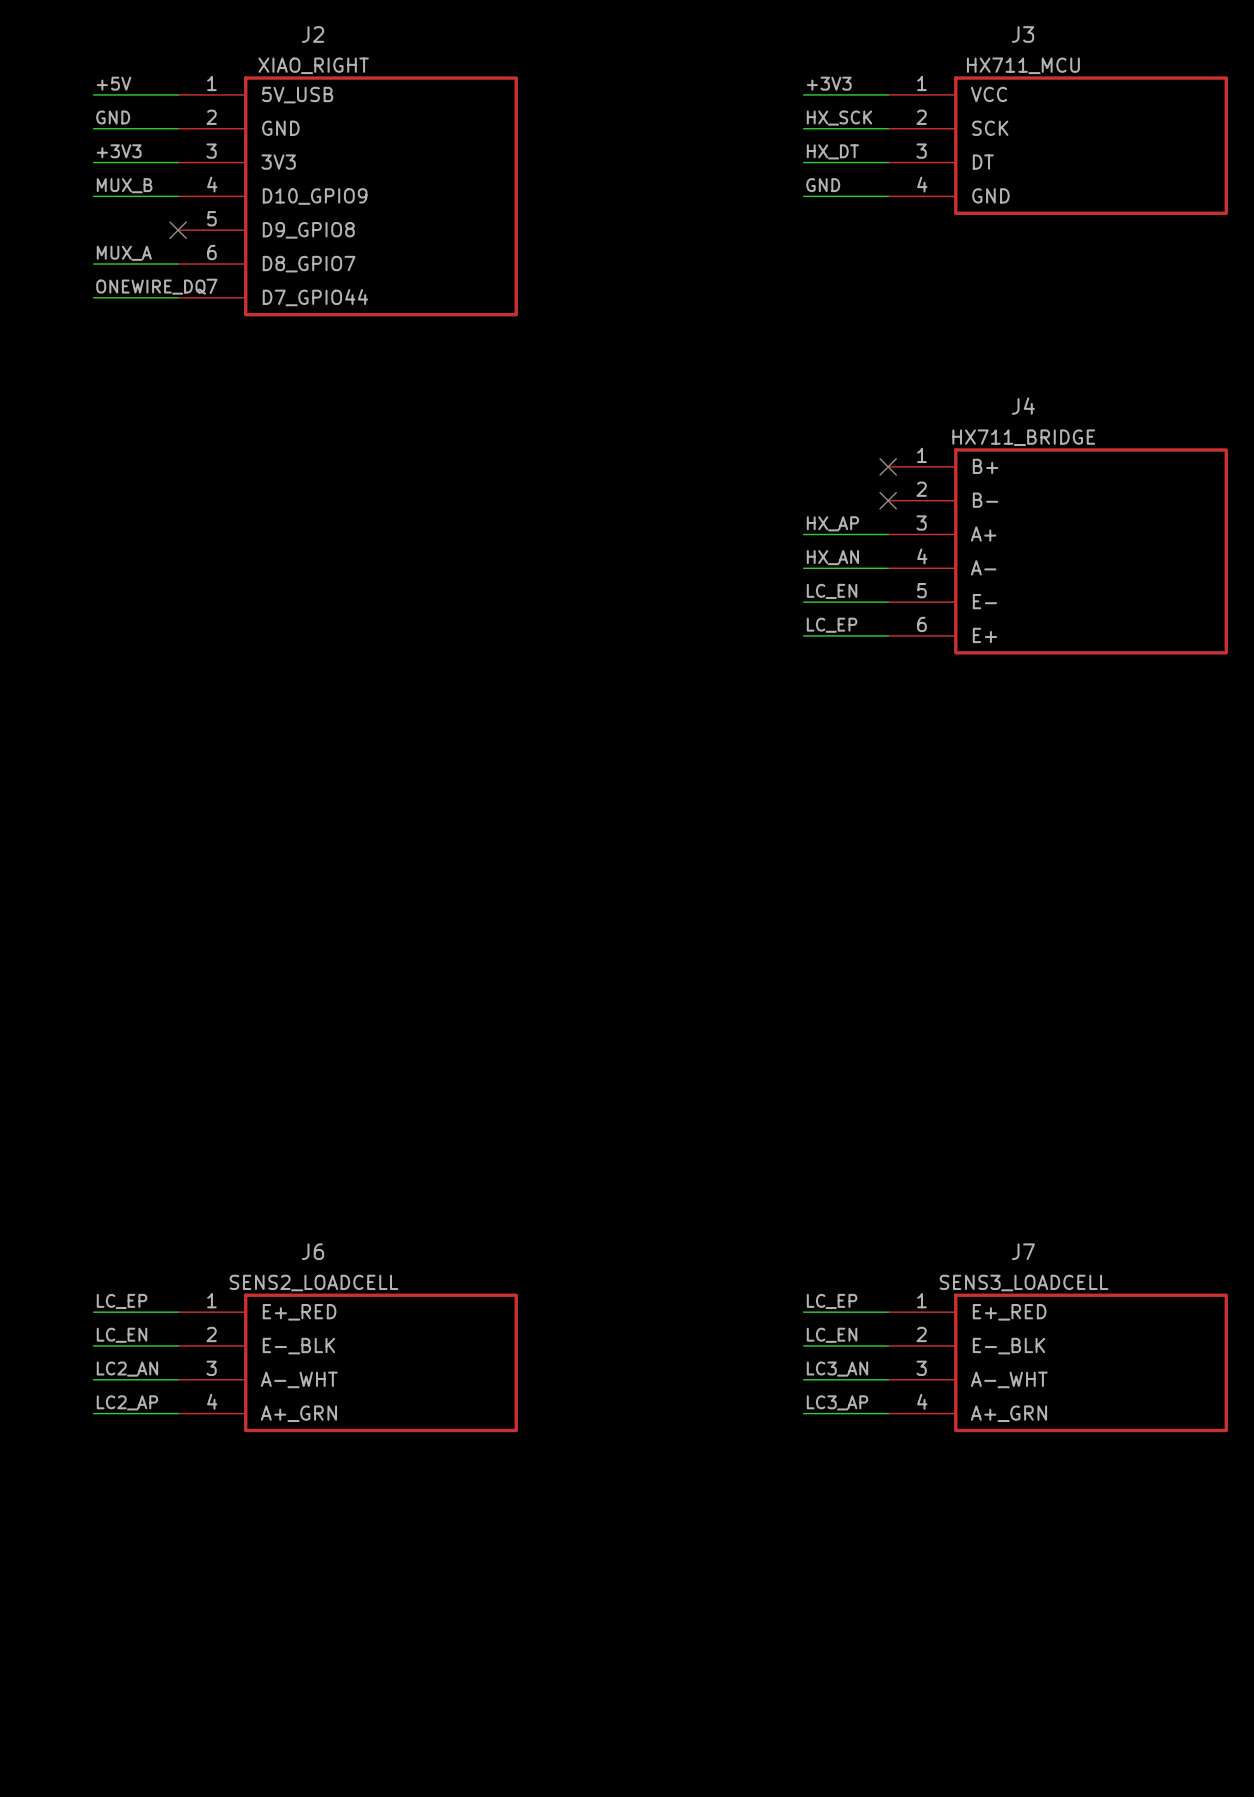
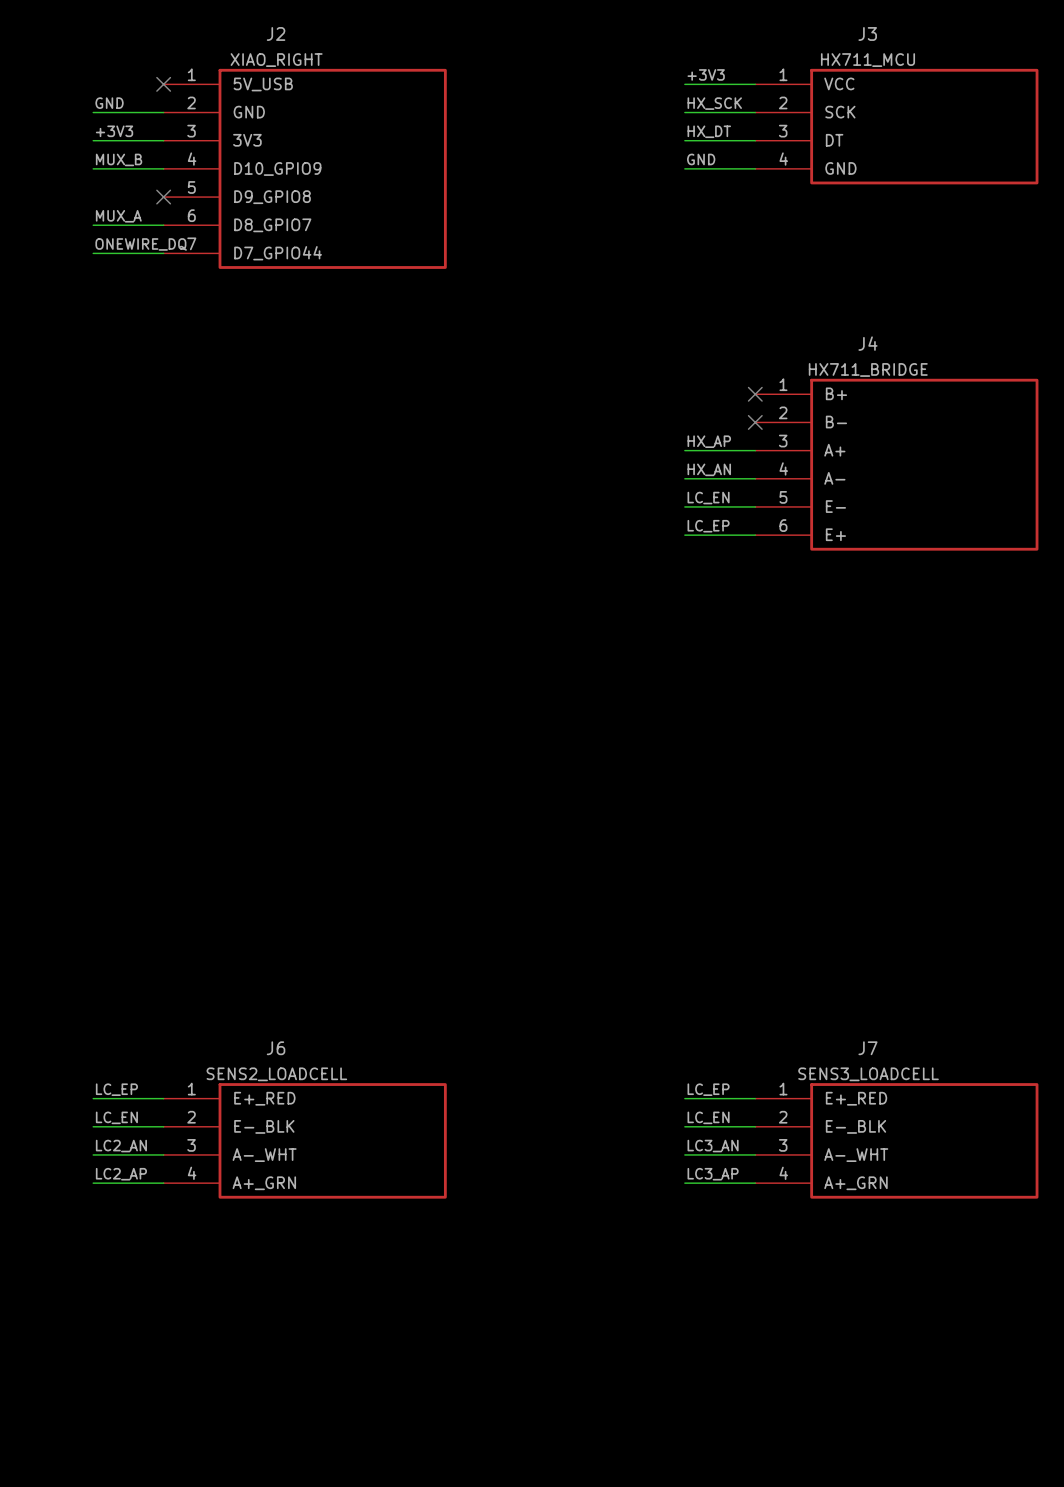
label: +5V (114, 83) -> none
wire: (93, 94) (178, 94) -> none
no-connect mark: none -> (163, 84)

